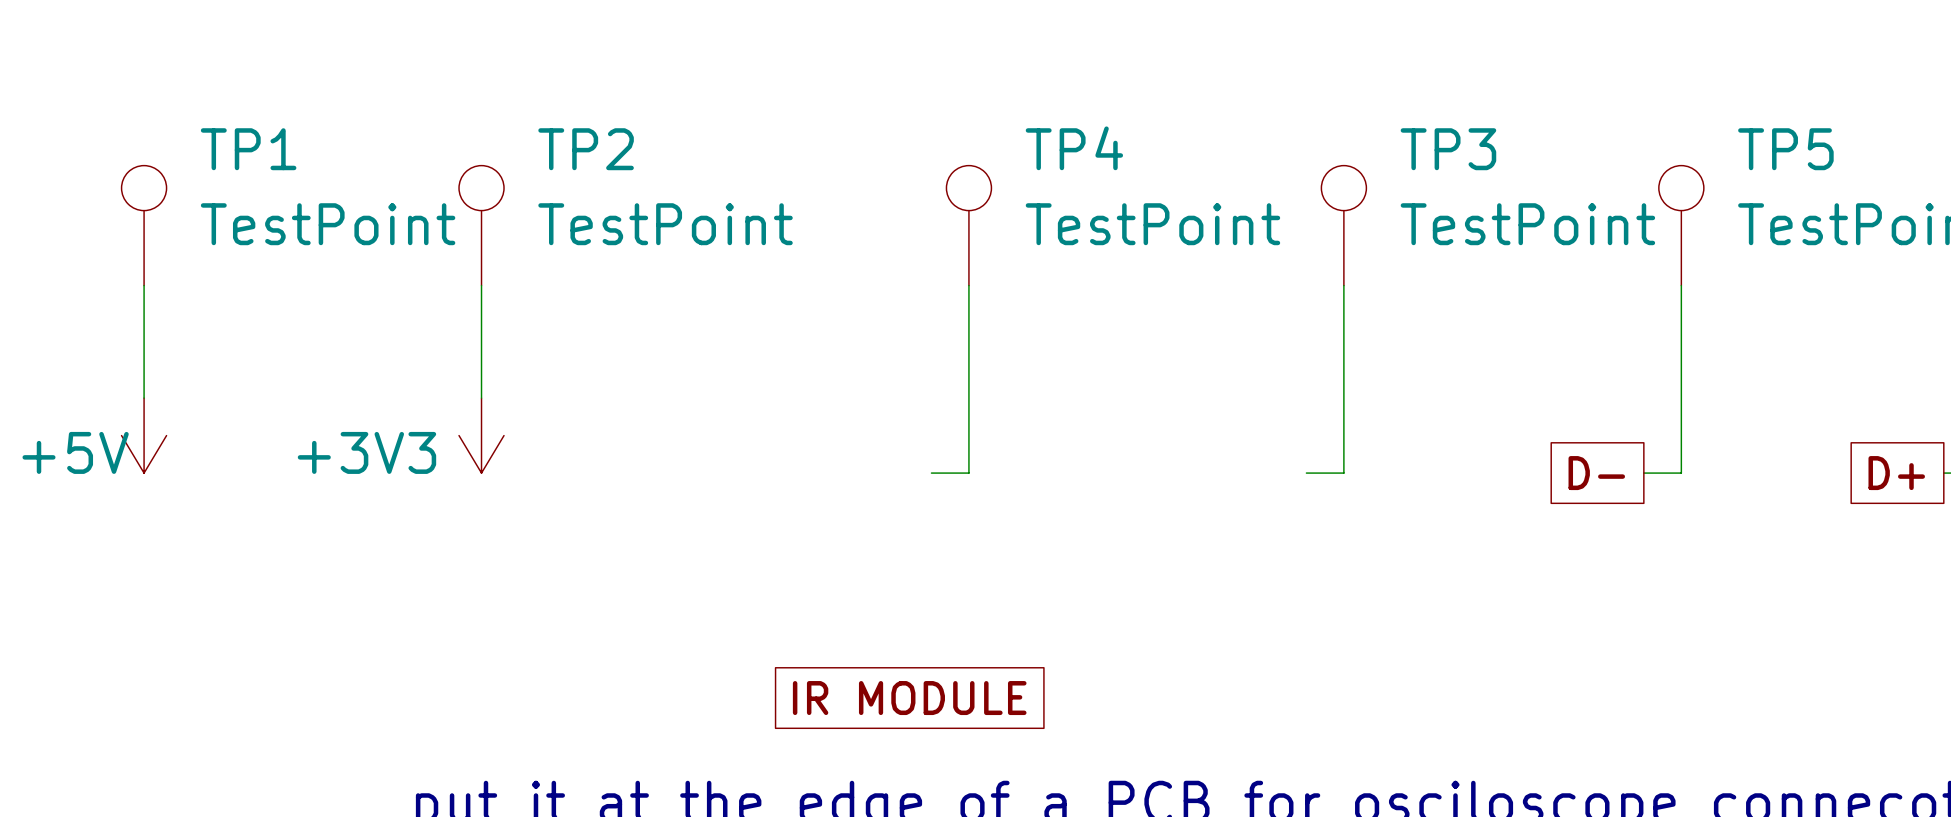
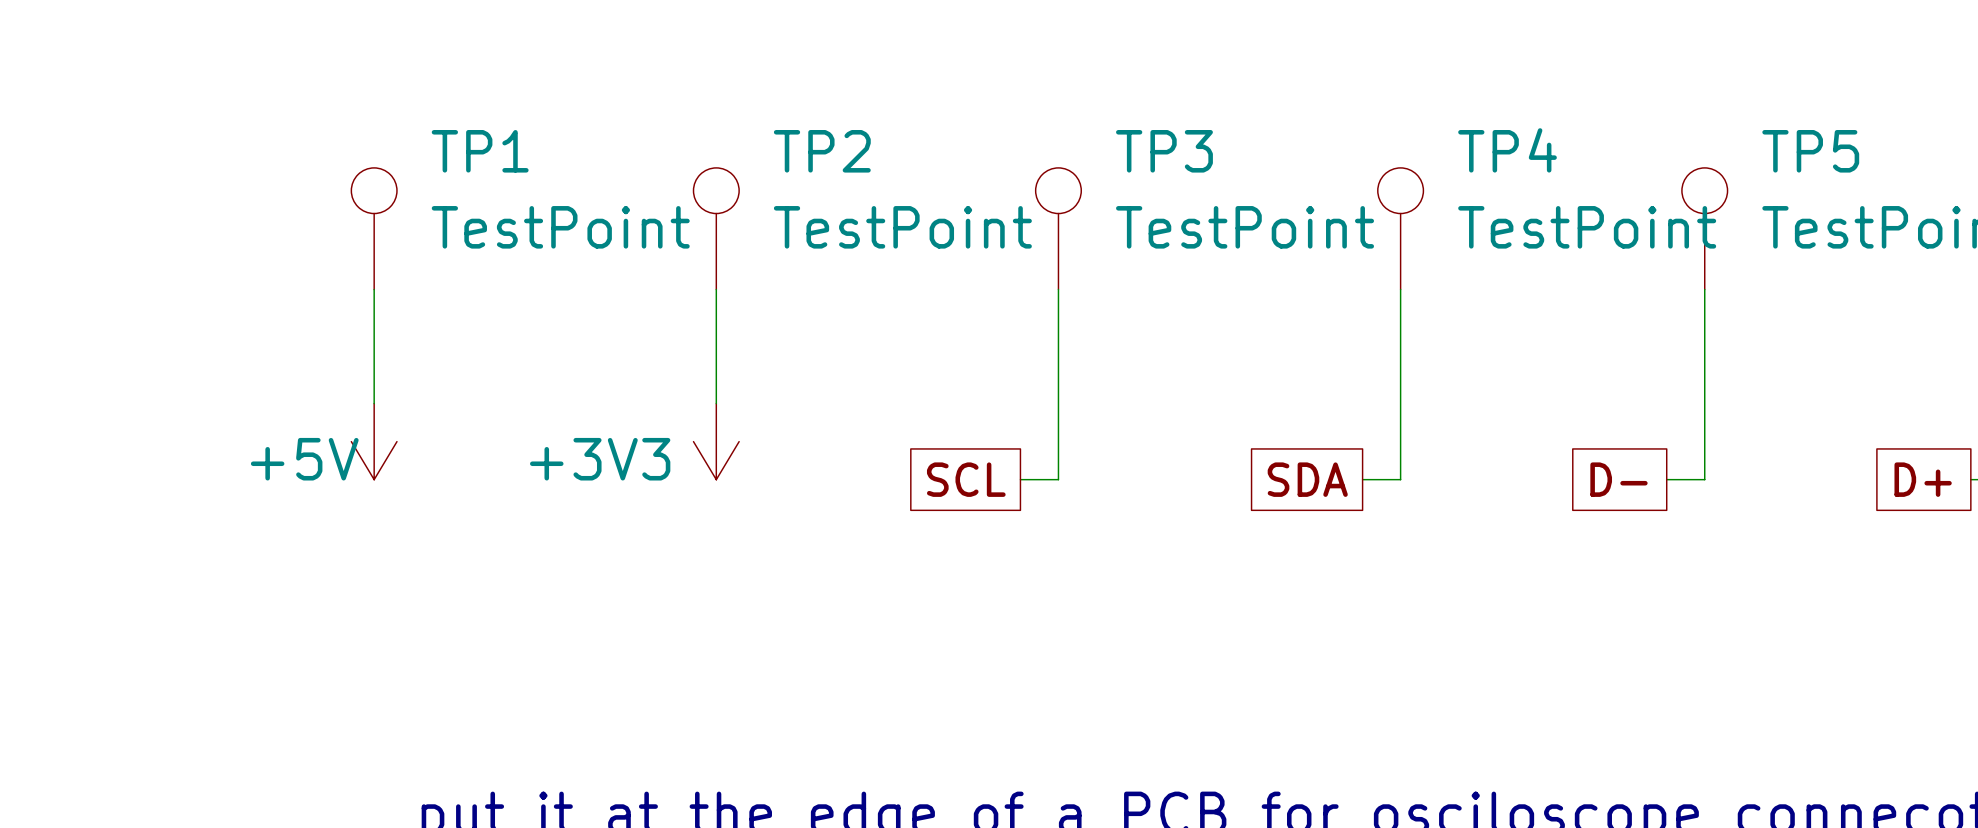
TP1 position: (144, 225) -> (374, 228)
TP2 position: (481, 225) -> (716, 228)
TP4 position: (968, 225) -> (1400, 228)
TP3 position: (1343, 225) -> (1058, 228)
wire: (144, 285) (144, 398) -> (374, 289) (374, 403)
wire: (481, 285) (481, 398) -> (716, 289) (716, 403)
wire: (968, 285) (968, 473) (931, 473) -> (1058, 289) (1058, 479) (1020, 479)
wire: (1343, 285) (1343, 473) (1306, 473) -> (1400, 289) (1400, 479) (1362, 479)
power symbol position: +5V (144, 435) -> +5V (374, 441)
power symbol position: +3V3 (481, 435) -> +3V3 (716, 441)
global label: none -> SCL (966, 479)
global label: none -> SDA (1307, 479)
global label: IR MODULE (909, 698) -> none

